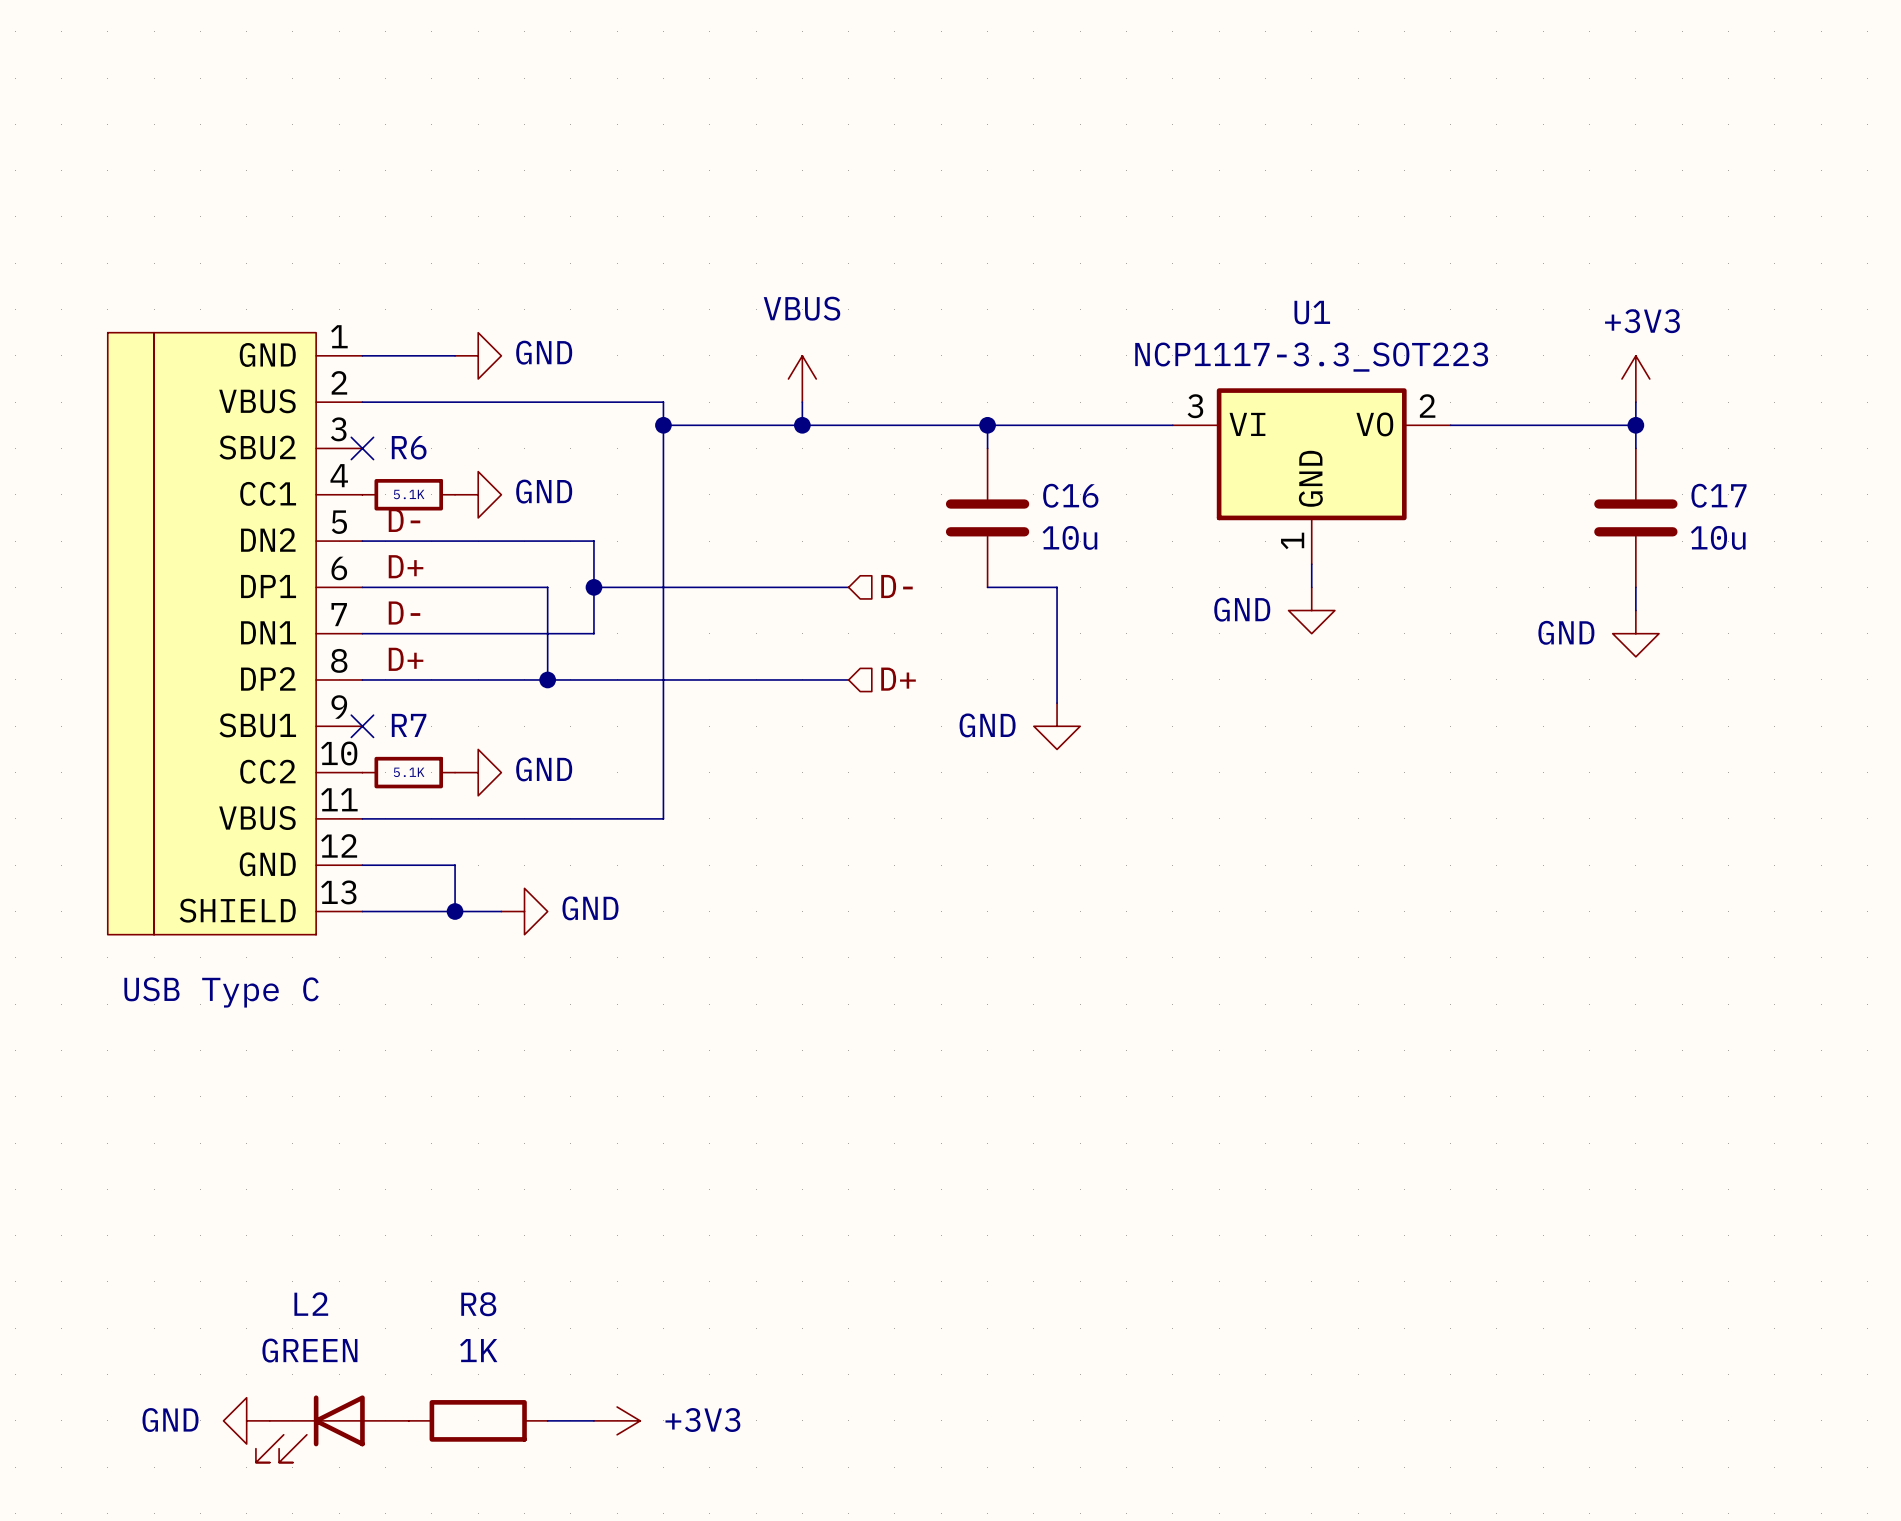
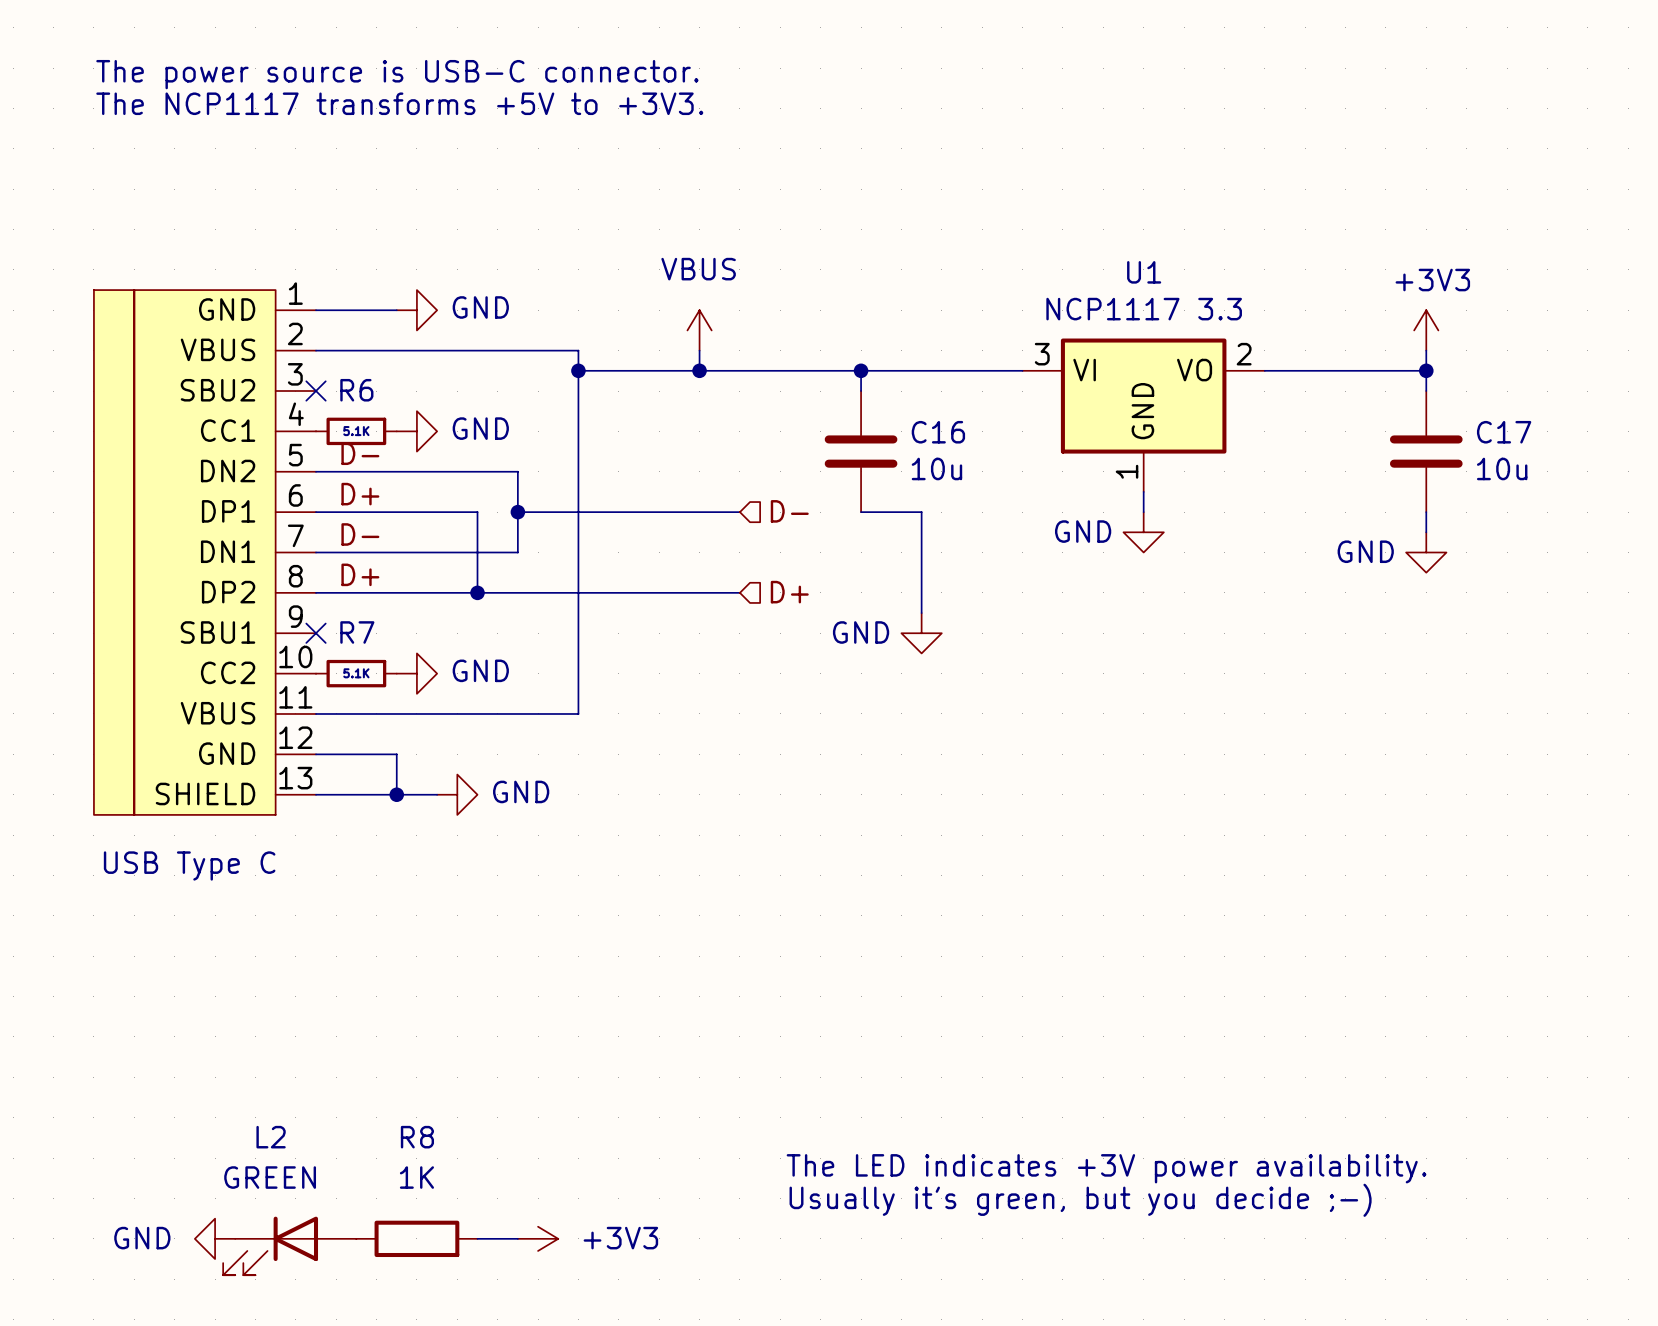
text: none -> The power source is USB-C connector. (397, 74)
text: none -> The NCP1117 transforms +5V to +3V3. (399, 103)
U1 value: NCP1117-3.3_SOT223 (1311, 357) -> NCP1117 3.3 (1144, 309)
text: none -> The LED indicates +3V power availability. (1106, 1168)
text: none -> Usually it's green, but you decide ;-) (1080, 1200)

